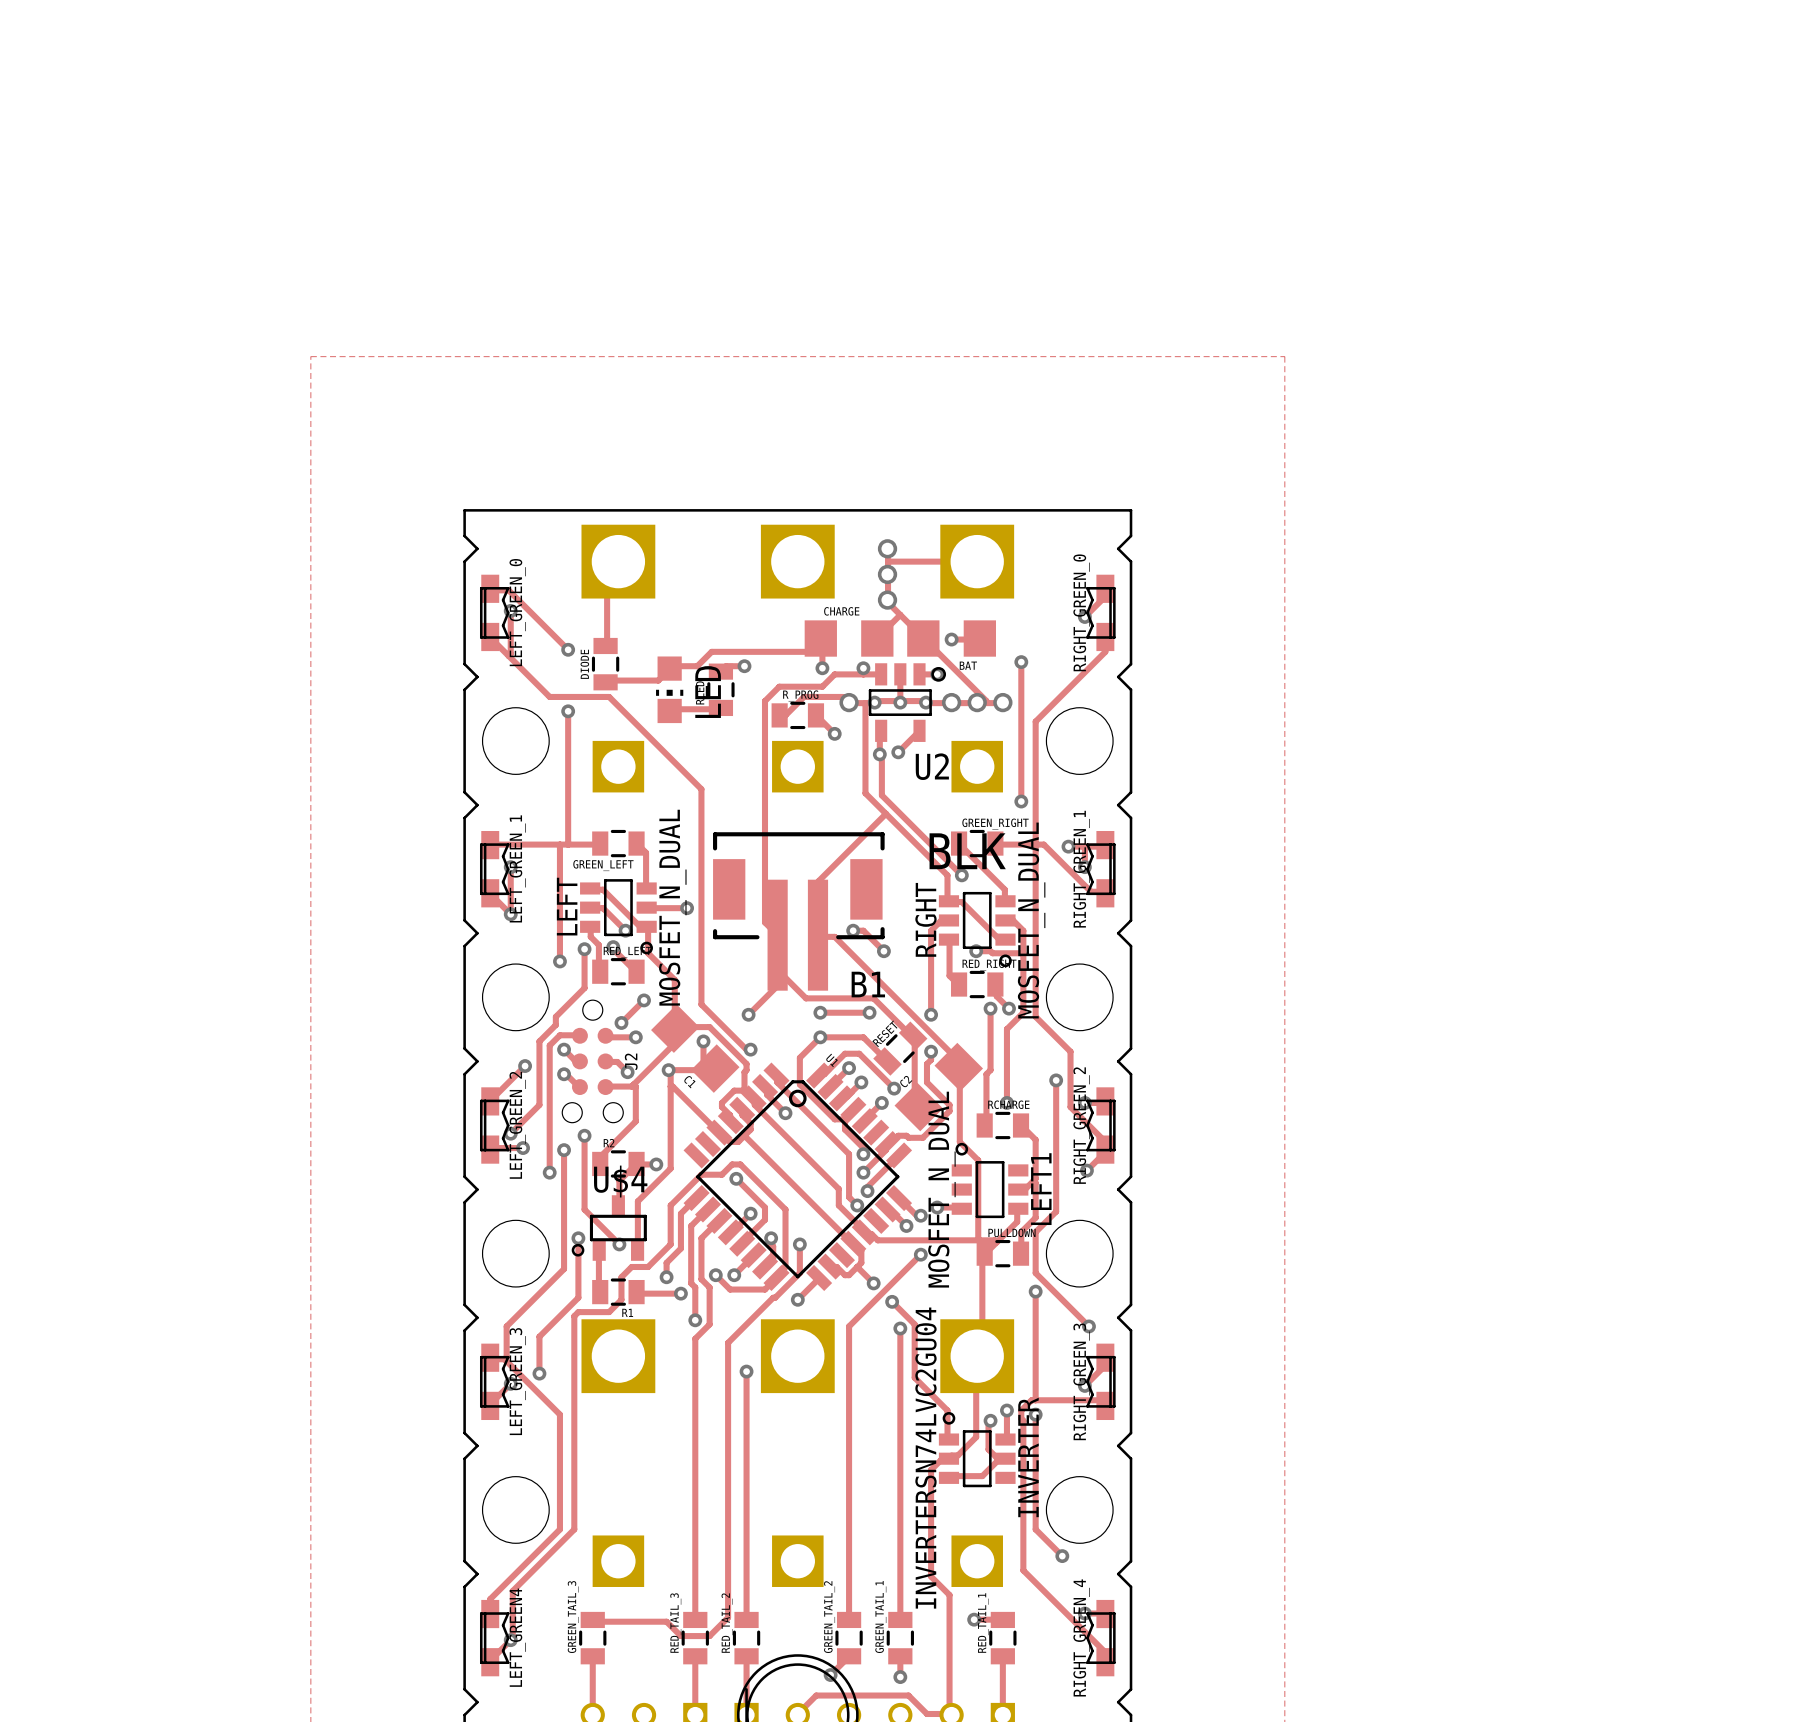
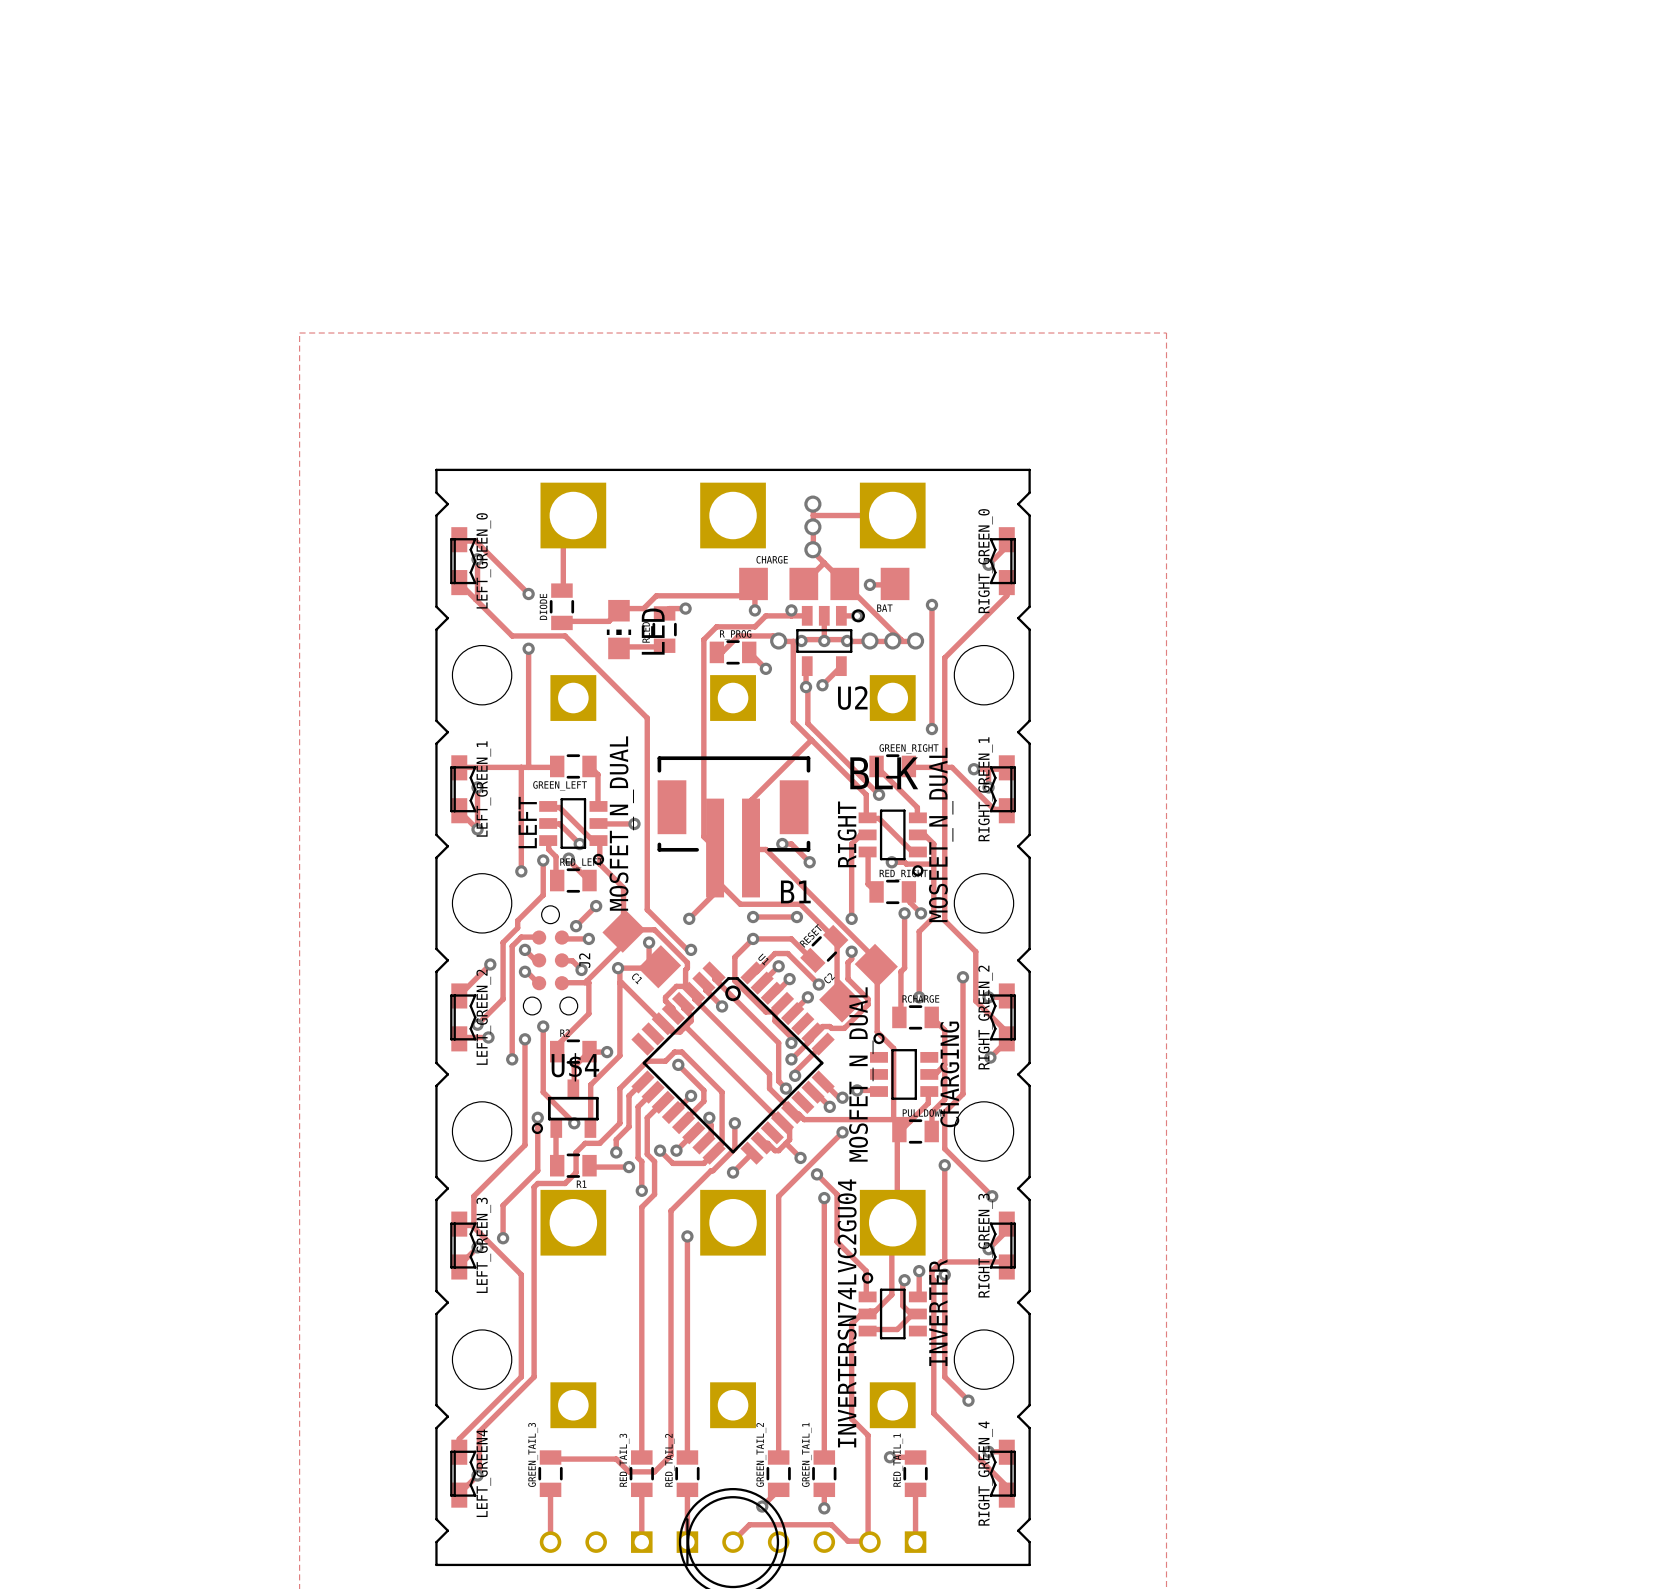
LEFT1 name: LEFT1 (1041, 1189) -> CHARGING (949, 1074)

